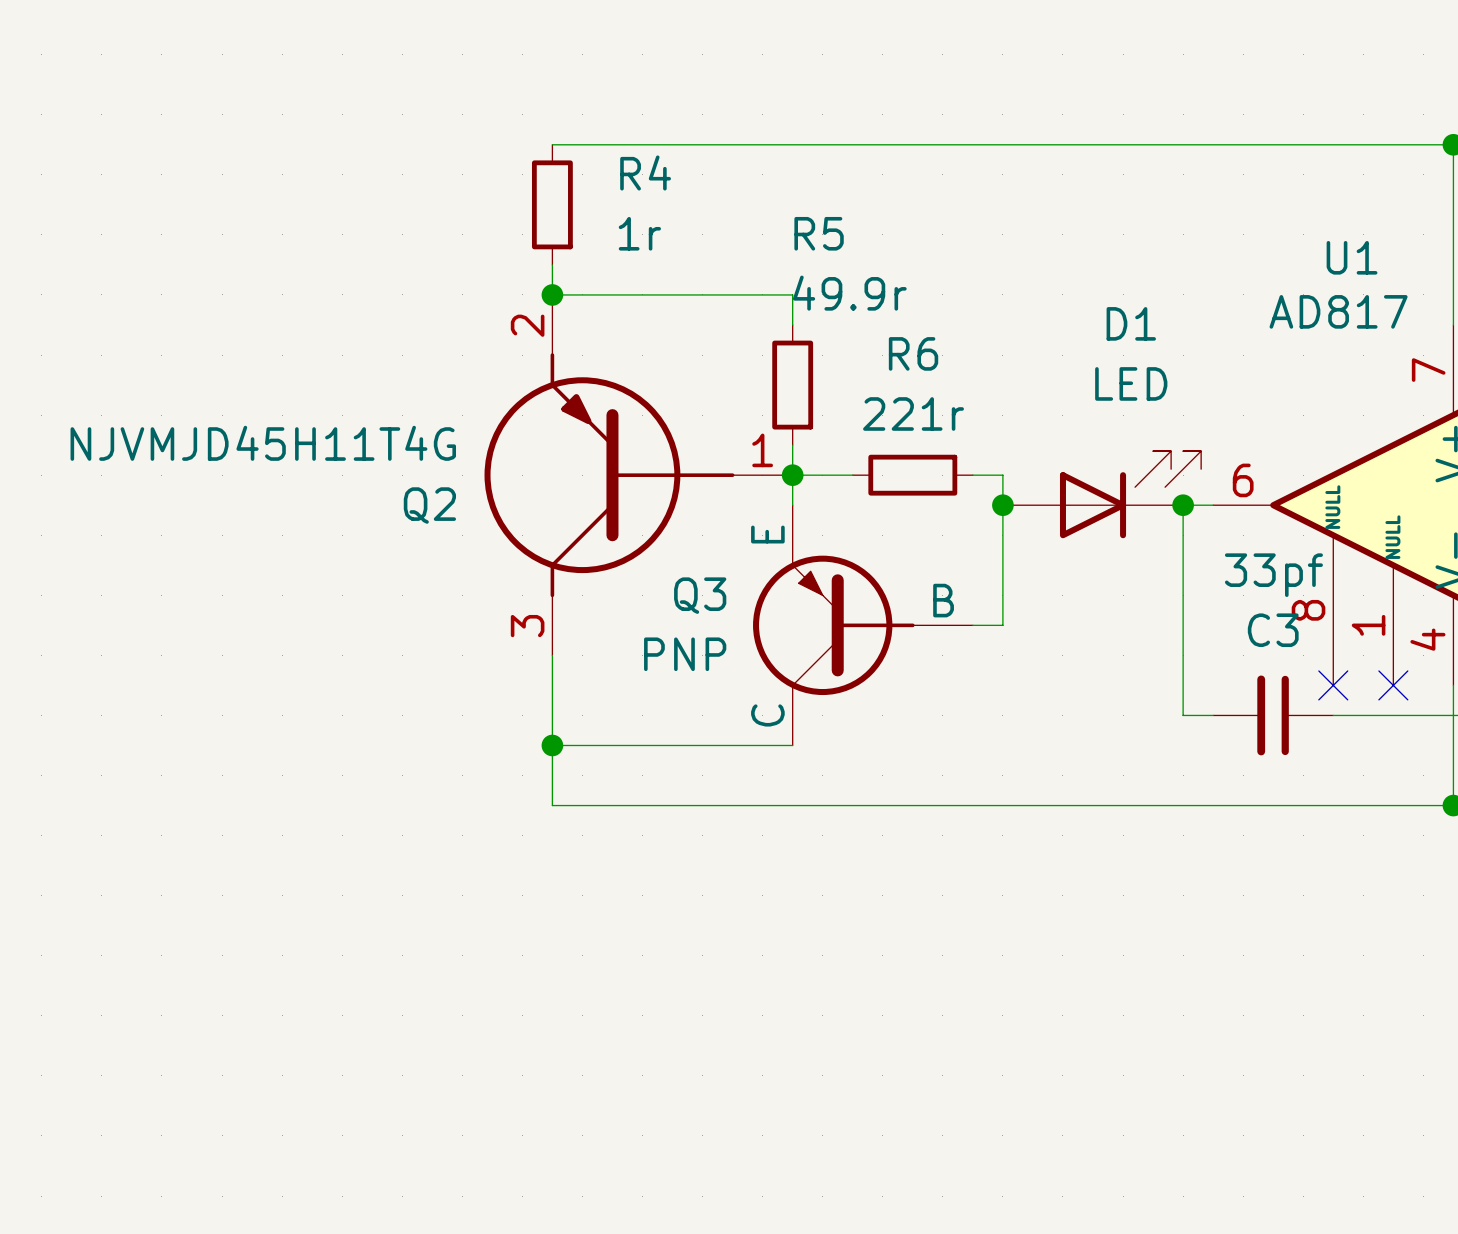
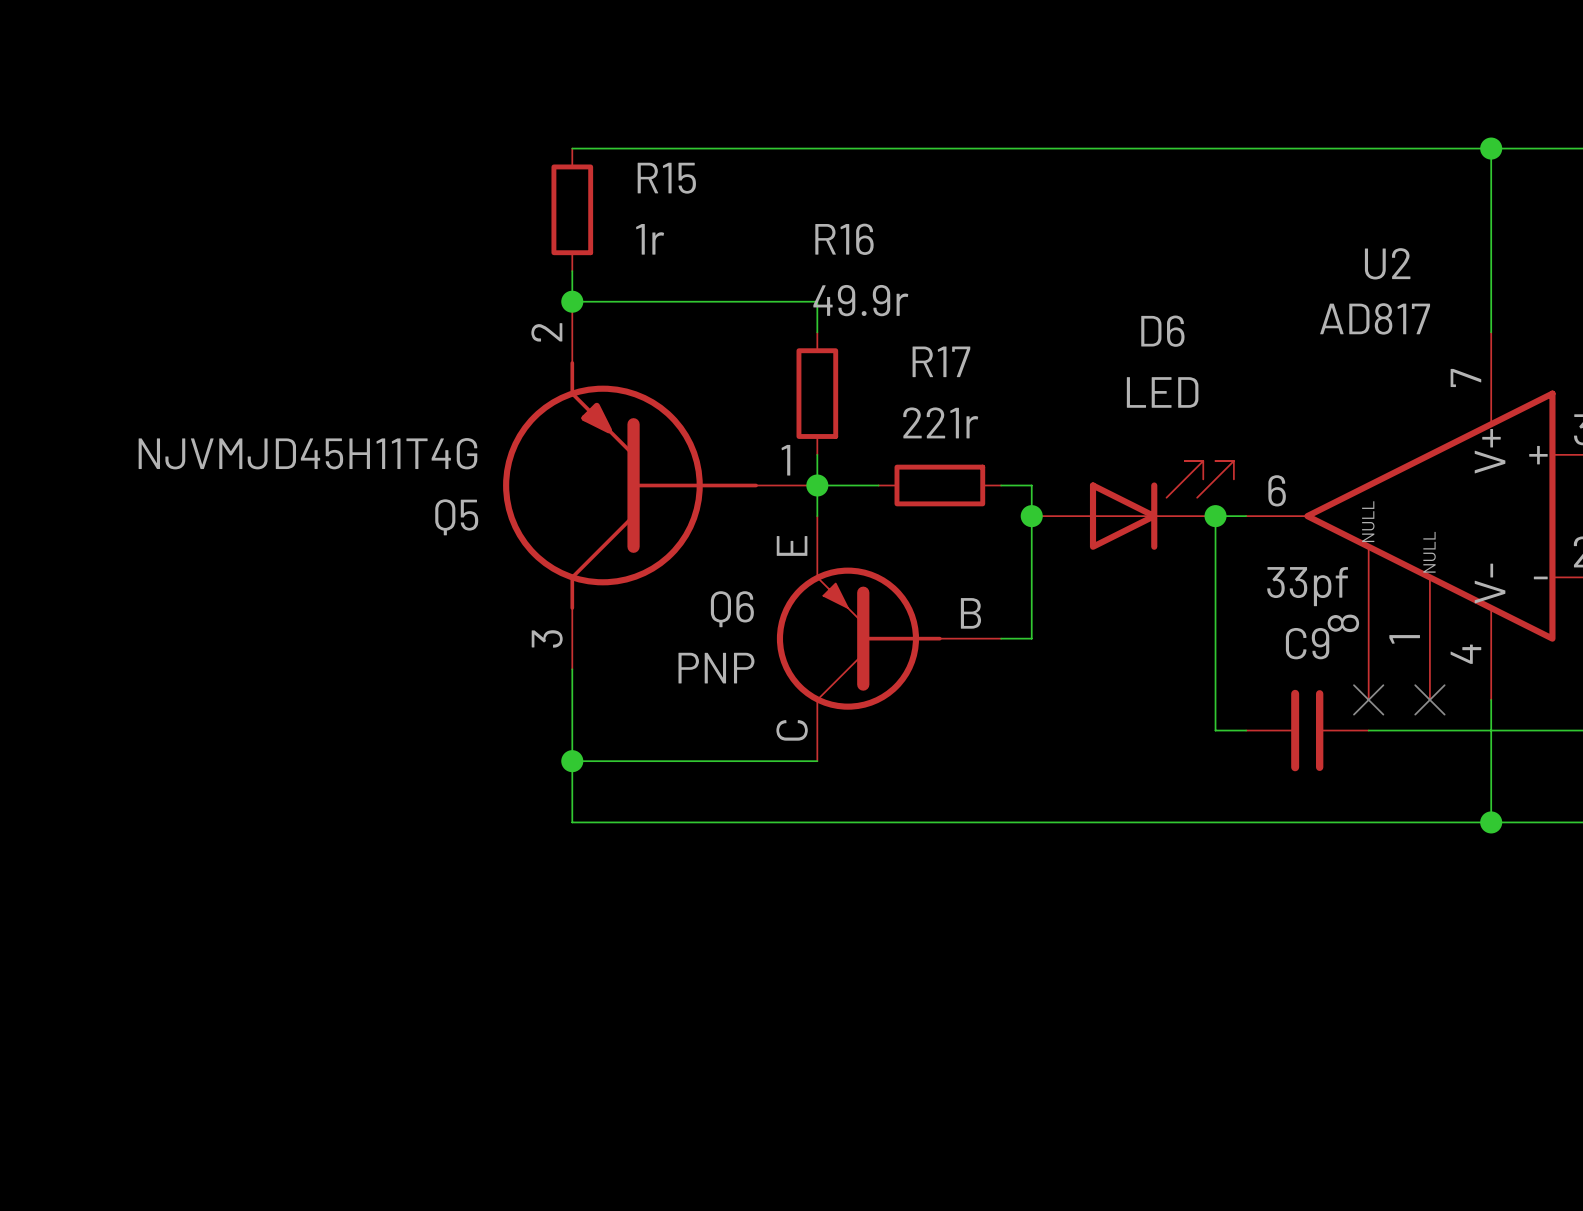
R4 name: R4 (645, 172) -> R15 (666, 178)
R5 name: R5 (819, 233) -> R16 (844, 239)
U1 name: U1 (1352, 257) -> U2 (1387, 263)
D1 name: D1 (1131, 323) -> D6 (1162, 331)
R6 name: R6 (913, 353) -> R17 (941, 361)
Q2 name: Q2 (429, 505) -> Q5 (456, 517)
Q3 name: Q3 (700, 595) -> Q6 (732, 609)
C3 name: C3 (1273, 630) -> C9 (1307, 643)

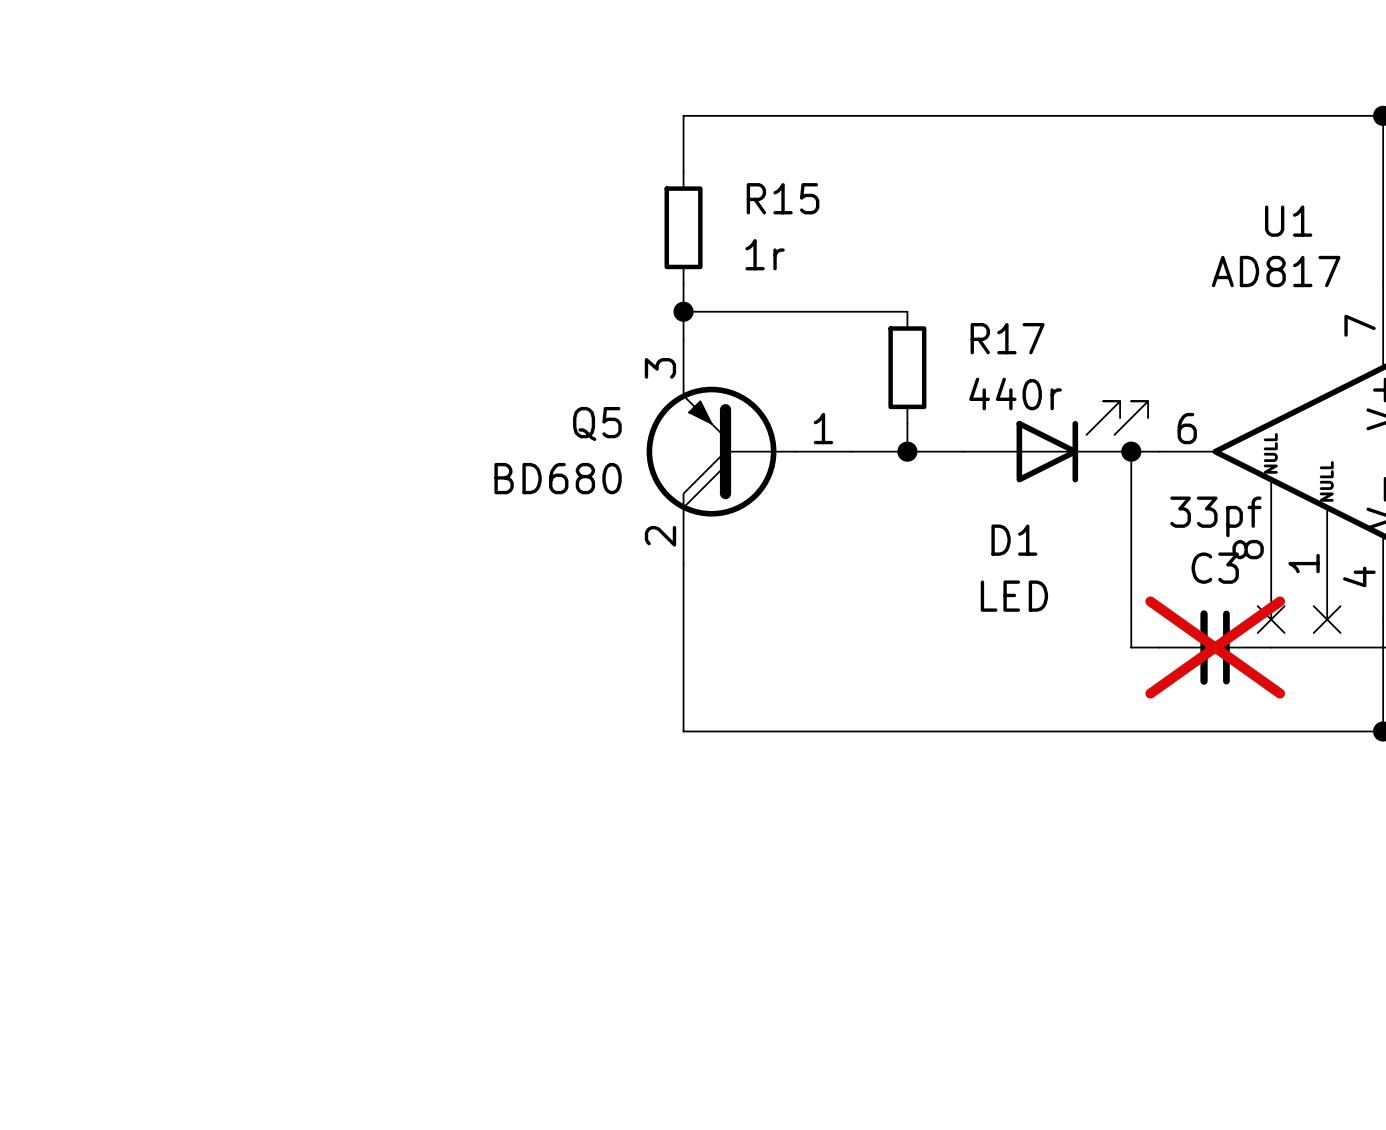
wire: (572, 148) (725, 148) -> (683, 171) (683, 115)
R15 position: (572, 209) -> (683, 227)
U2 name: U2 (1387, 263) -> U1 (1288, 221)
wire: (572, 271) (572, 301) (817, 301) (817, 332) -> none
Q5 symbol: [503, 301, 818, 670] -> [646, 339, 852, 564]
junction: (572, 301) -> none
D6 name: D6 (1162, 331) -> D1 (1014, 540)
junction: none -> (683, 311)
D6 value position: LED (1162, 392) -> LED (1014, 596)
R16: 49.9r (817, 393) -> none
R17 value: 221r (940, 422) -> 440r (1015, 393)
Q5 value: NJVMJD45H11T4G (307, 453) -> BD680 (558, 478)
wire: (817, 454) (817, 516) -> (683, 283) (683, 339)
wire: (817, 485) (878, 485) -> none
junction: (817, 485) -> none
R17 rotation: 0° (939, 485) -> 90° clockwise (907, 367)
wire: none -> (907, 423) (907, 451)
wire: (1001, 485) (1031, 485) (1031, 638) (1001, 638) -> none
wire: none -> (851, 451) (963, 451)
junction position: (1031, 516) -> (907, 451)
Q5 name position: Q5 (456, 517) -> Q5 (597, 423)
Q6: PNP (889, 638) -> none
C9 name: C9 (1307, 643) -> C3 (1215, 568)
wire: (572, 669) (572, 822) (725, 822) -> (683, 563) (683, 731)
C9 do-not-place cross: none -> (1215, 647)
wire: (572, 761) (817, 761) -> (683, 311) (907, 311)
junction: (572, 761) -> none

